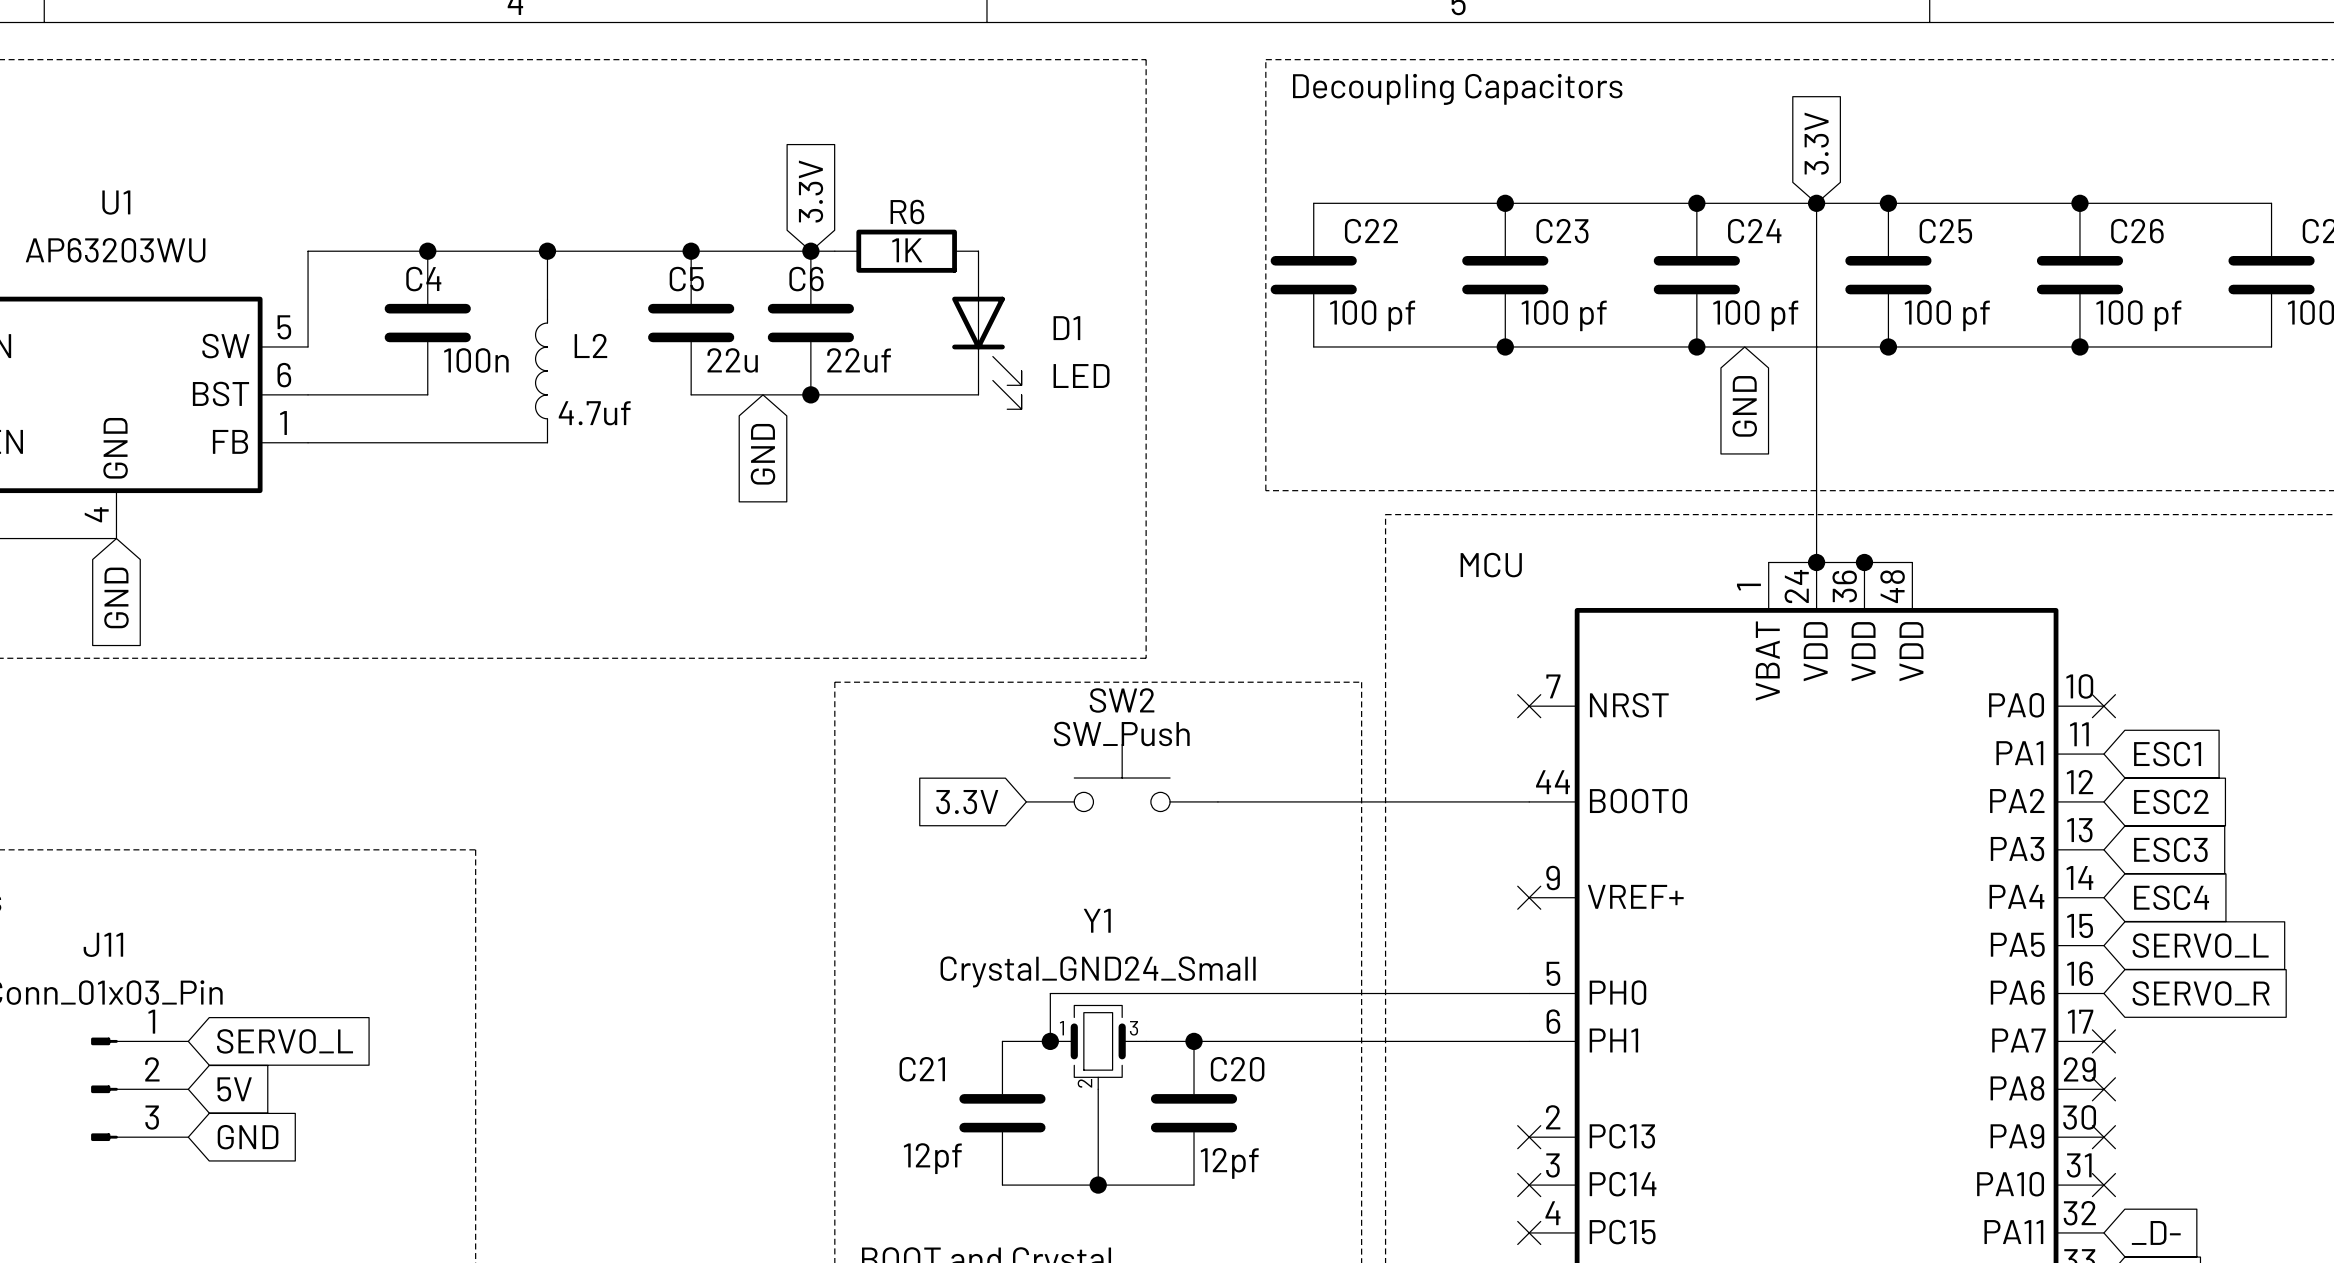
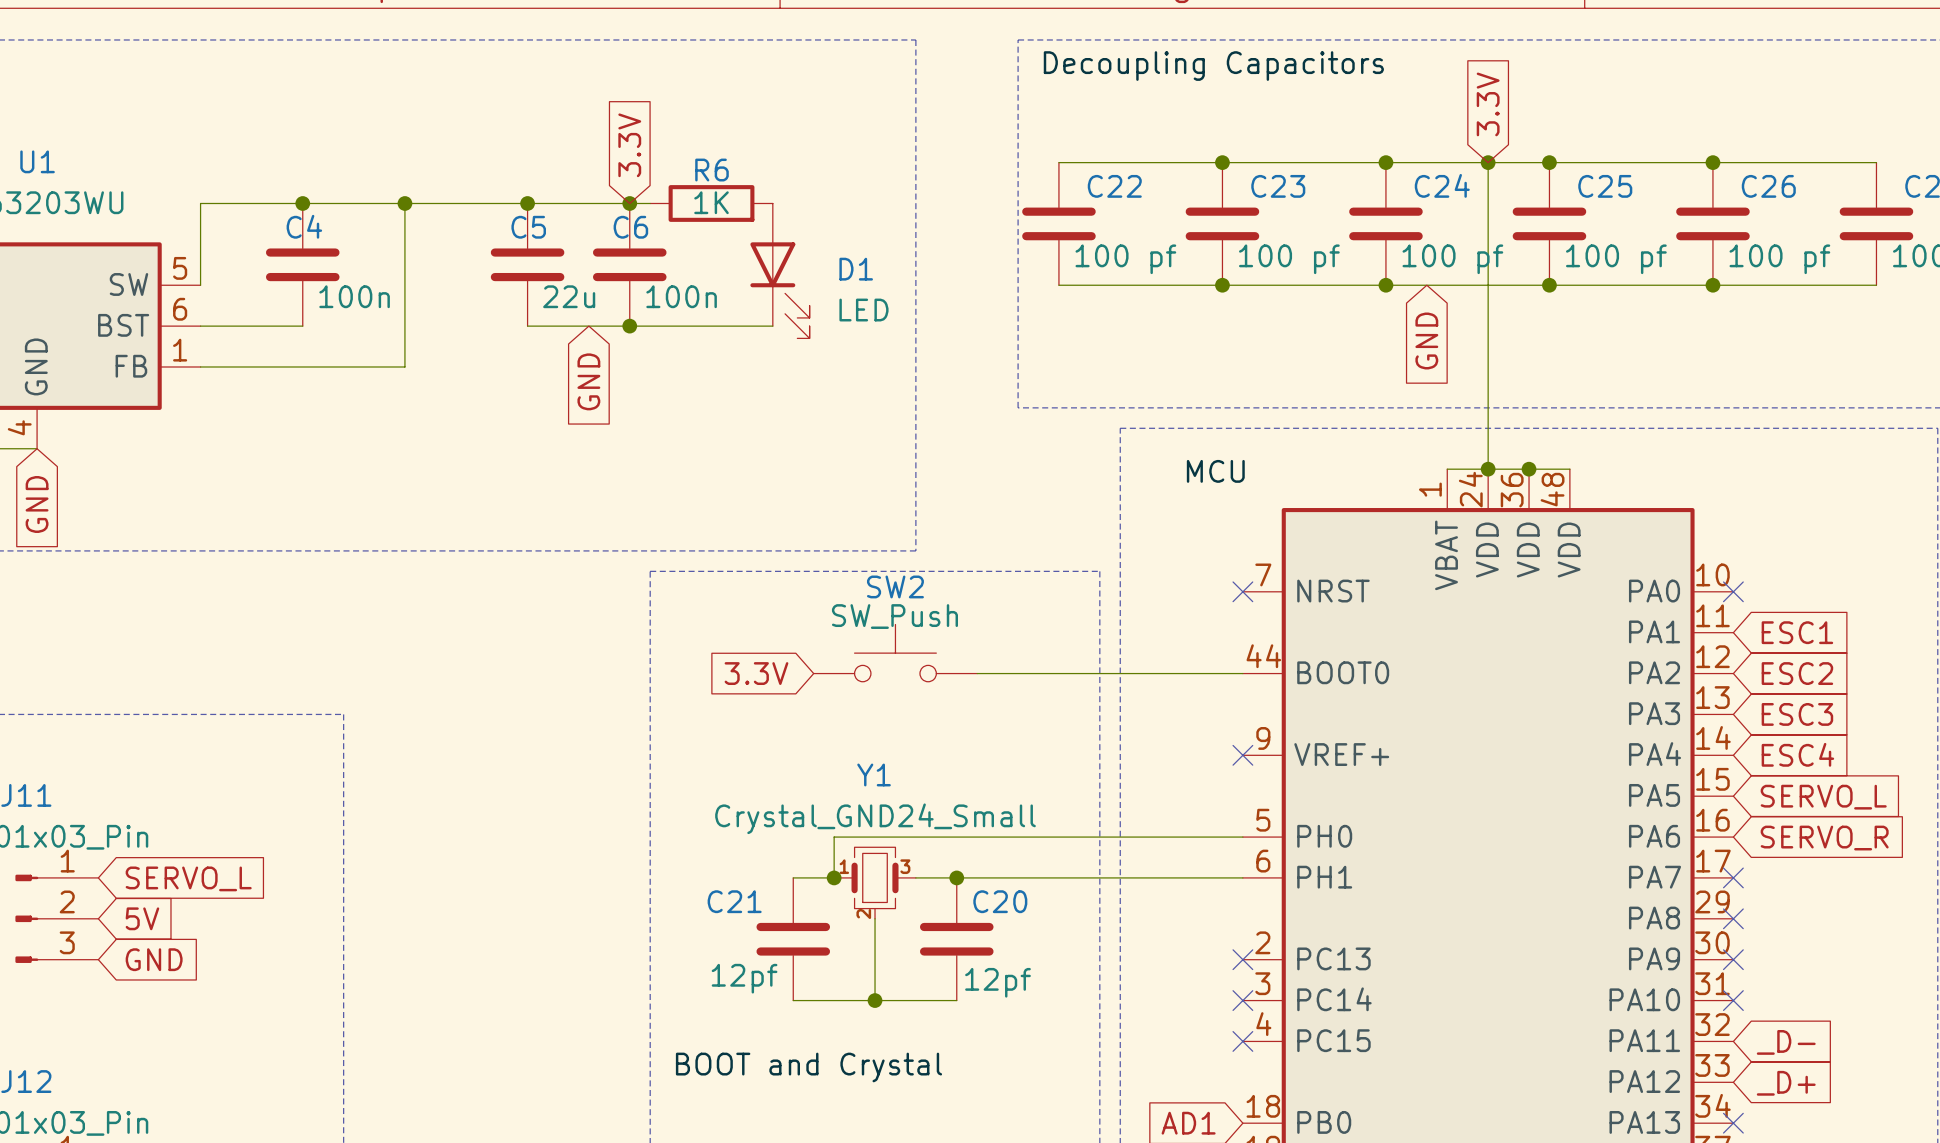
wire: none -> (404, 244) (404, 366)
C6 value: 22uf (859, 360) -> 100n (681, 296)
L2: 4.7uf (541, 370) -> none

